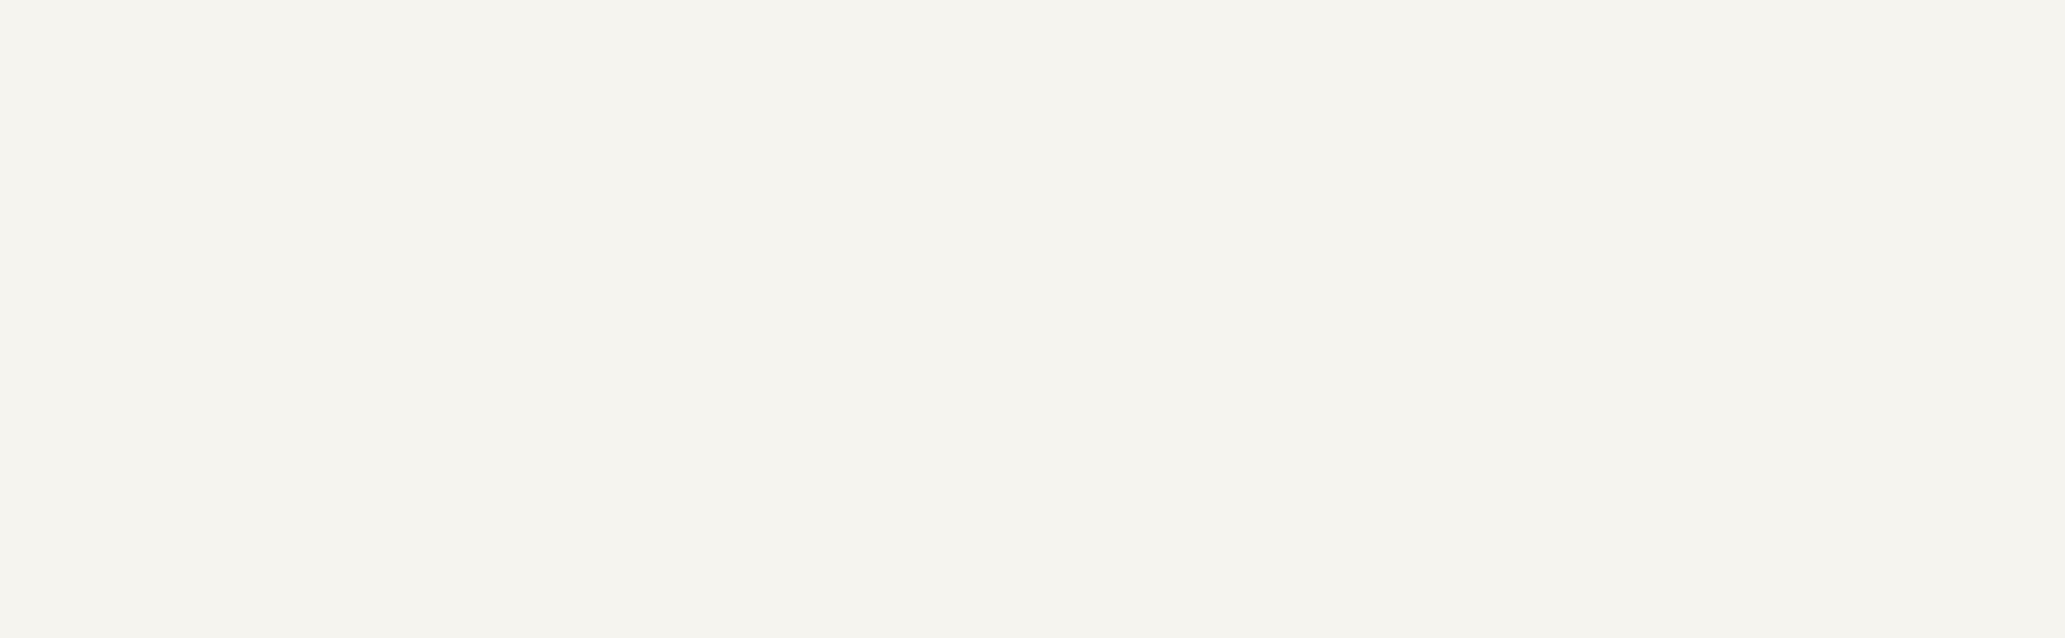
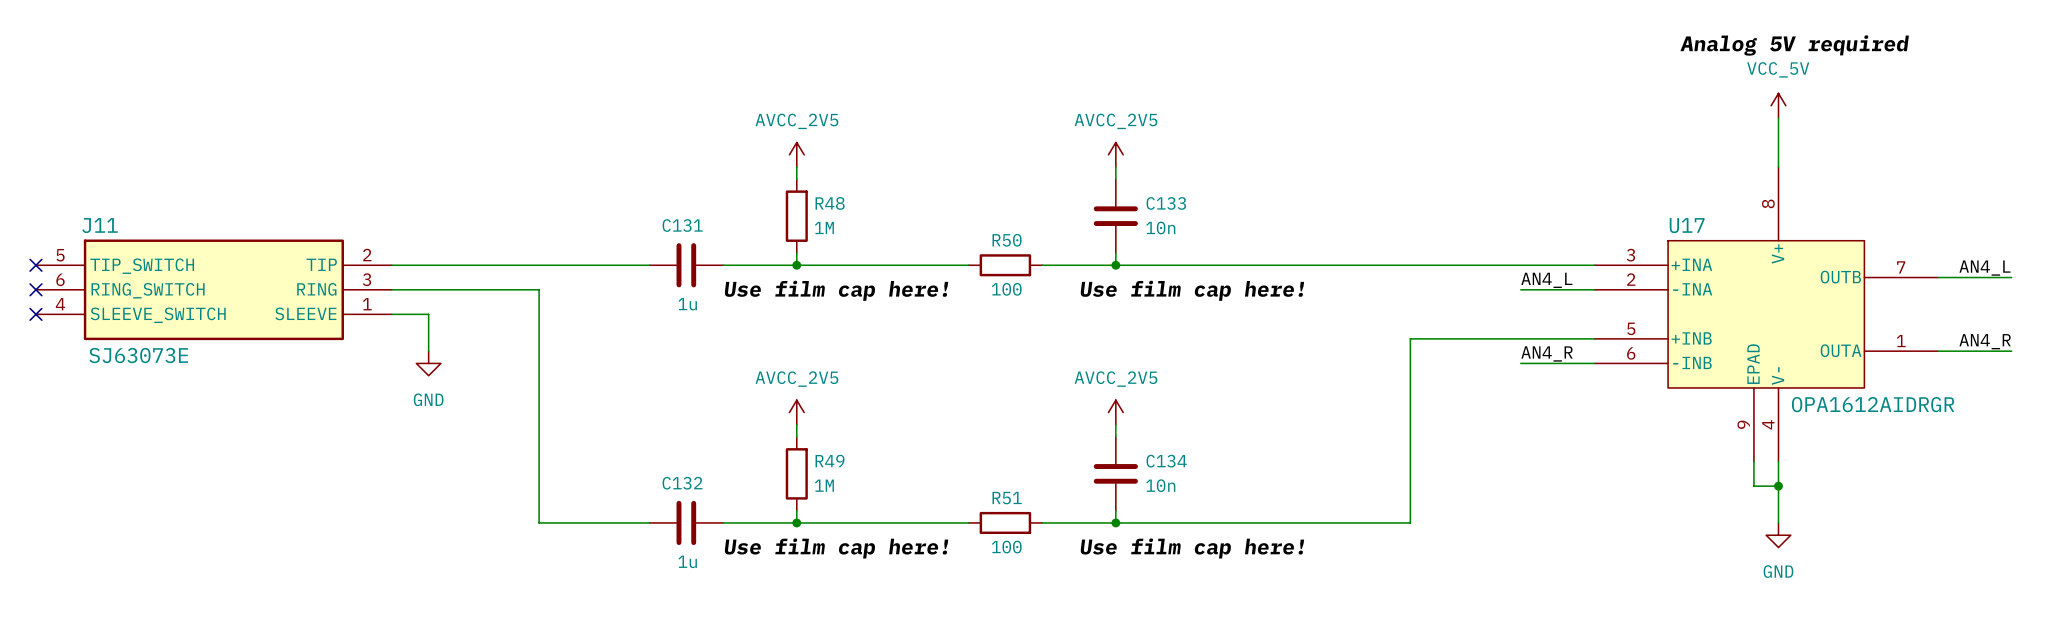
label: none -> Analog 5V required (1794, 45)
power symbol: none -> VCC_5V (1778, 105)
wire: none -> (1778, 118) (1778, 167)
power symbol: none -> AVCC_2V5 (796, 154)
power symbol: none -> AVCC_2V5 (1115, 154)
wire: none -> (796, 167) (796, 179)
wire: none -> (1115, 167) (1115, 179)
R48: none -> 1M (796, 216)
C133: none -> 10n (1115, 216)
wire: none -> (796, 252) (796, 265)
wire: none -> (1115, 252) (1115, 265)
no-connect mark: none -> (35, 265)
wire: none -> (391, 265) (649, 265)
C131: none -> 1u (686, 265)
wire: none -> (723, 265) (968, 265)
junction: none -> (796, 265)
R50: none -> 100 (1005, 265)
wire: none -> (1042, 265) (1594, 265)
junction: none -> (1115, 265)
label: none -> AN4_L (1984, 268)
wire: none -> (1938, 277) (2011, 277)
label: none -> AN4_L (1546, 280)
no-connect mark: none -> (35, 289)
J11: none -> SJ63073E (213, 289)
wire: none -> (391, 289) (539, 289) (539, 522) (649, 522)
wire: none -> (1520, 289) (1594, 289)
label: none -> Use film cap here! (836, 290)
label: none -> Use film cap here! (1192, 290)
no-connect mark: none -> (35, 314)
wire: none -> (391, 314) (428, 314) (428, 351)
U17: none -> OPA1612AIDRGR (1766, 314)
wire: none -> (1594, 338) (1410, 338) (1410, 522) (1042, 522)
label: none -> AN4_R (1985, 341)
wire: none -> (1938, 351) (2011, 351)
label: none -> AN4_R (1546, 353)
power symbol: none -> GND (428, 363)
wire: none -> (1520, 363) (1594, 363)
power symbol: none -> AVCC_2V5 (796, 412)
power symbol: none -> AVCC_2V5 (1115, 412)
wire: none -> (796, 424) (796, 437)
wire: none -> (1115, 424) (1115, 437)
wire: none -> (1753, 461) (1753, 486) (1778, 486)
wire: none -> (1778, 461) (1778, 522)
R49: none -> 1M (796, 473)
C134: none -> 10n (1115, 473)
junction: none -> (1778, 486)
wire: none -> (796, 510) (796, 522)
wire: none -> (1115, 510) (1115, 522)
C132: none -> 1u (686, 522)
wire: none -> (723, 522) (968, 522)
junction: none -> (796, 522)
R51: none -> 100 (1005, 522)
junction: none -> (1115, 522)
power symbol: none -> GND (1778, 535)
label: none -> Use film cap here! (836, 548)
label: none -> Use film cap here! (1192, 548)

